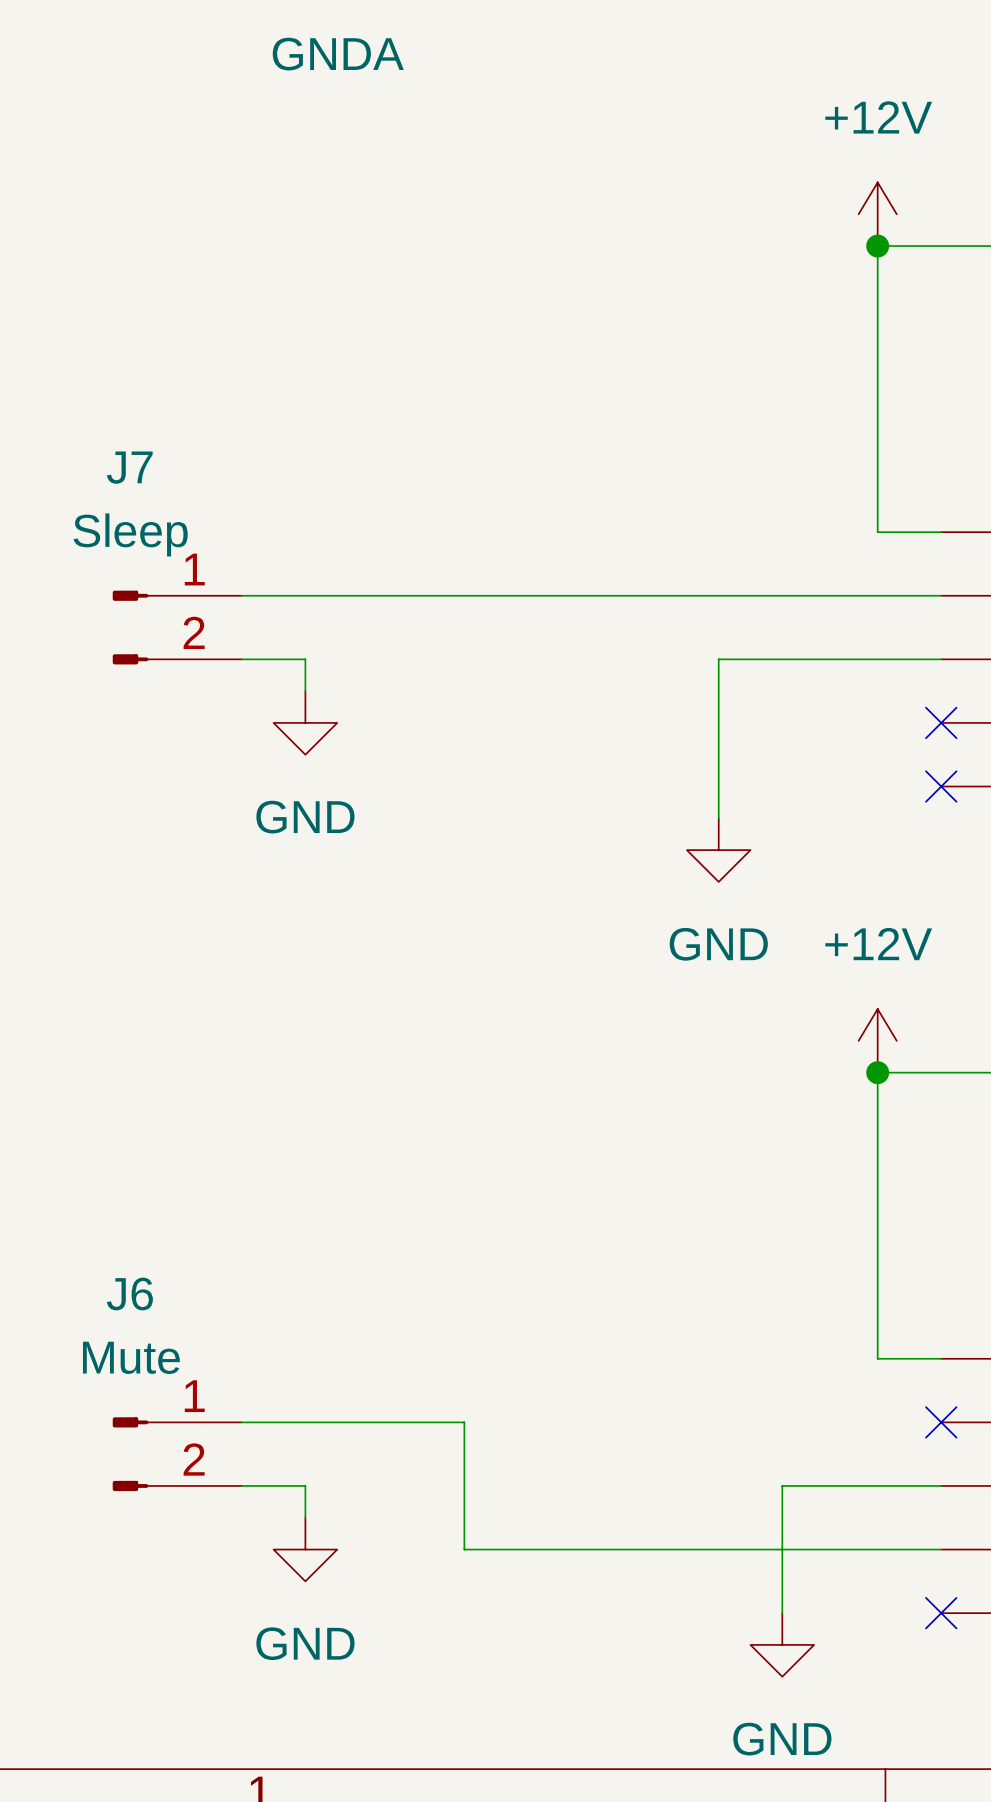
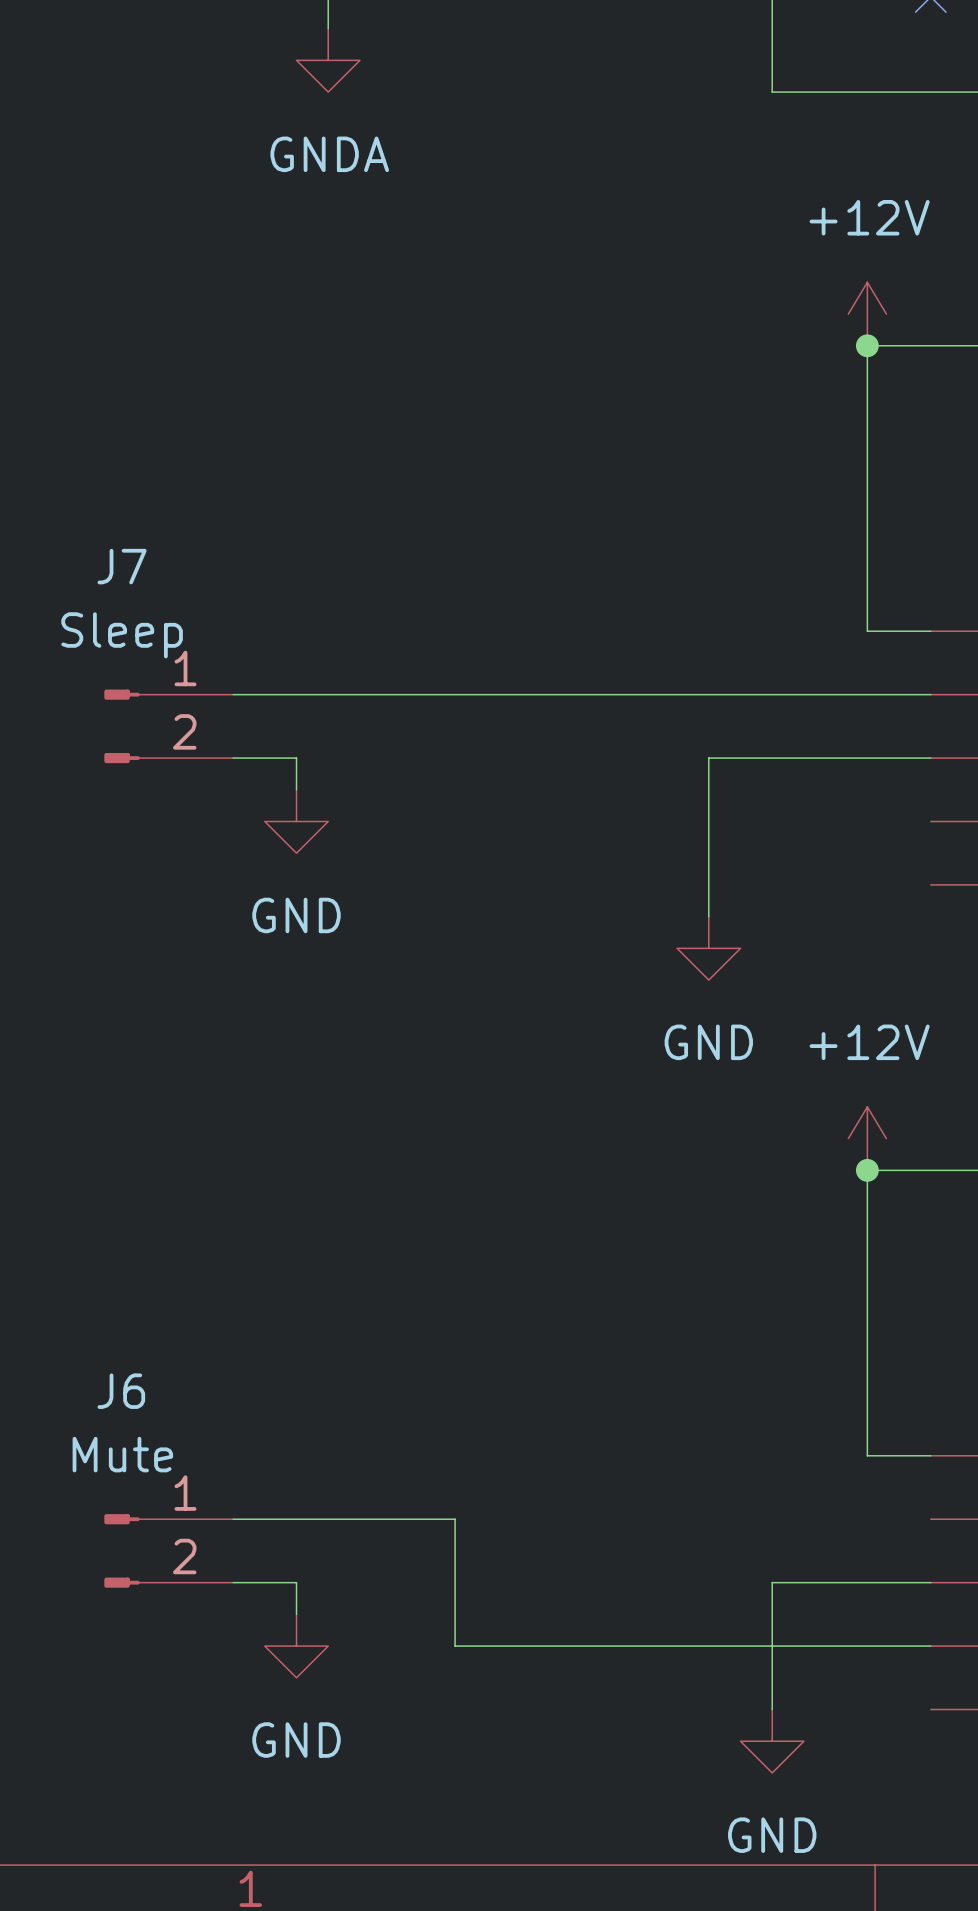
no-connect mark: (941, 722) -> none
no-connect mark: (941, 786) -> none
no-connect mark: (941, 1422) -> none
no-connect mark: (941, 1613) -> none

